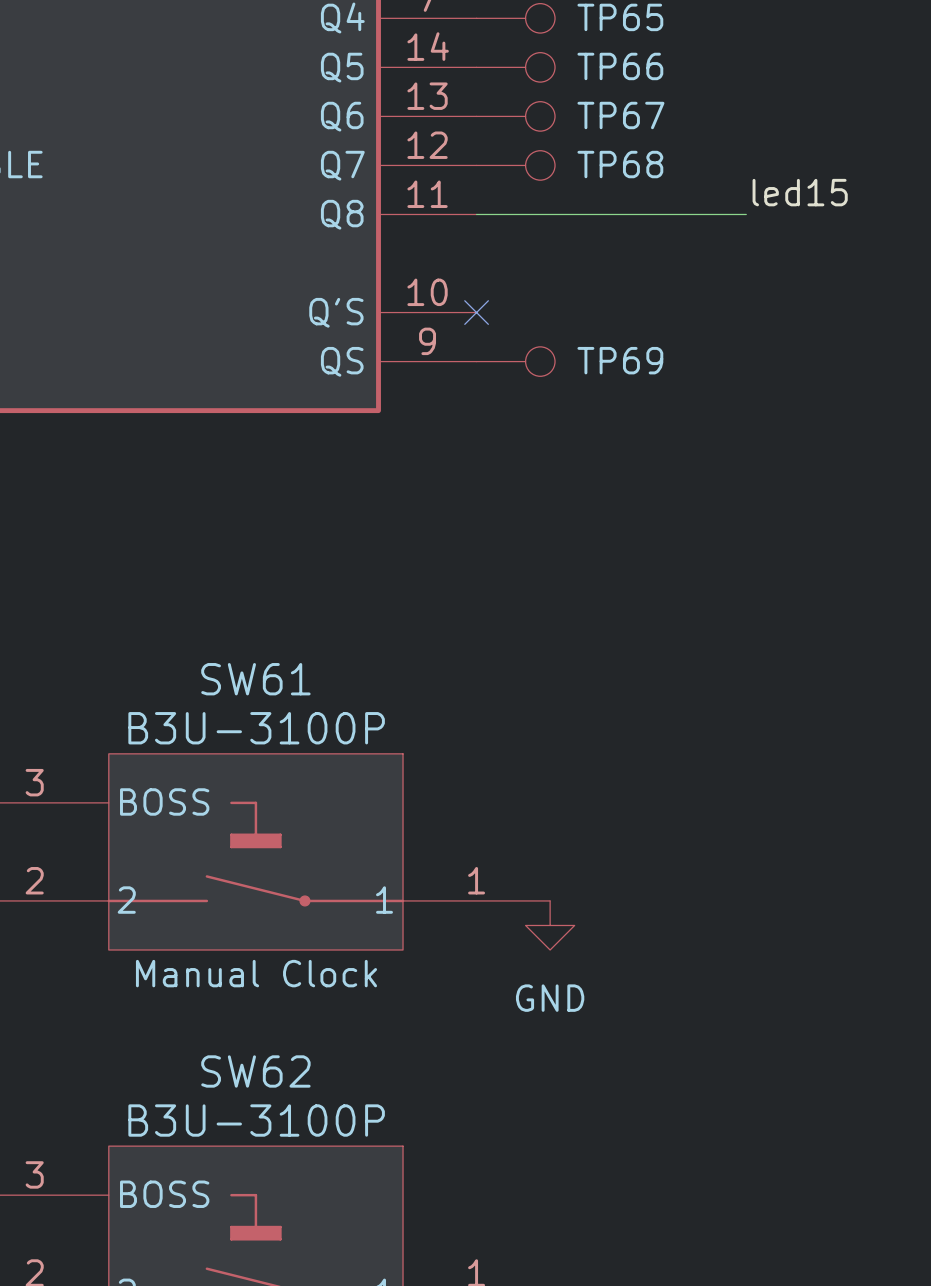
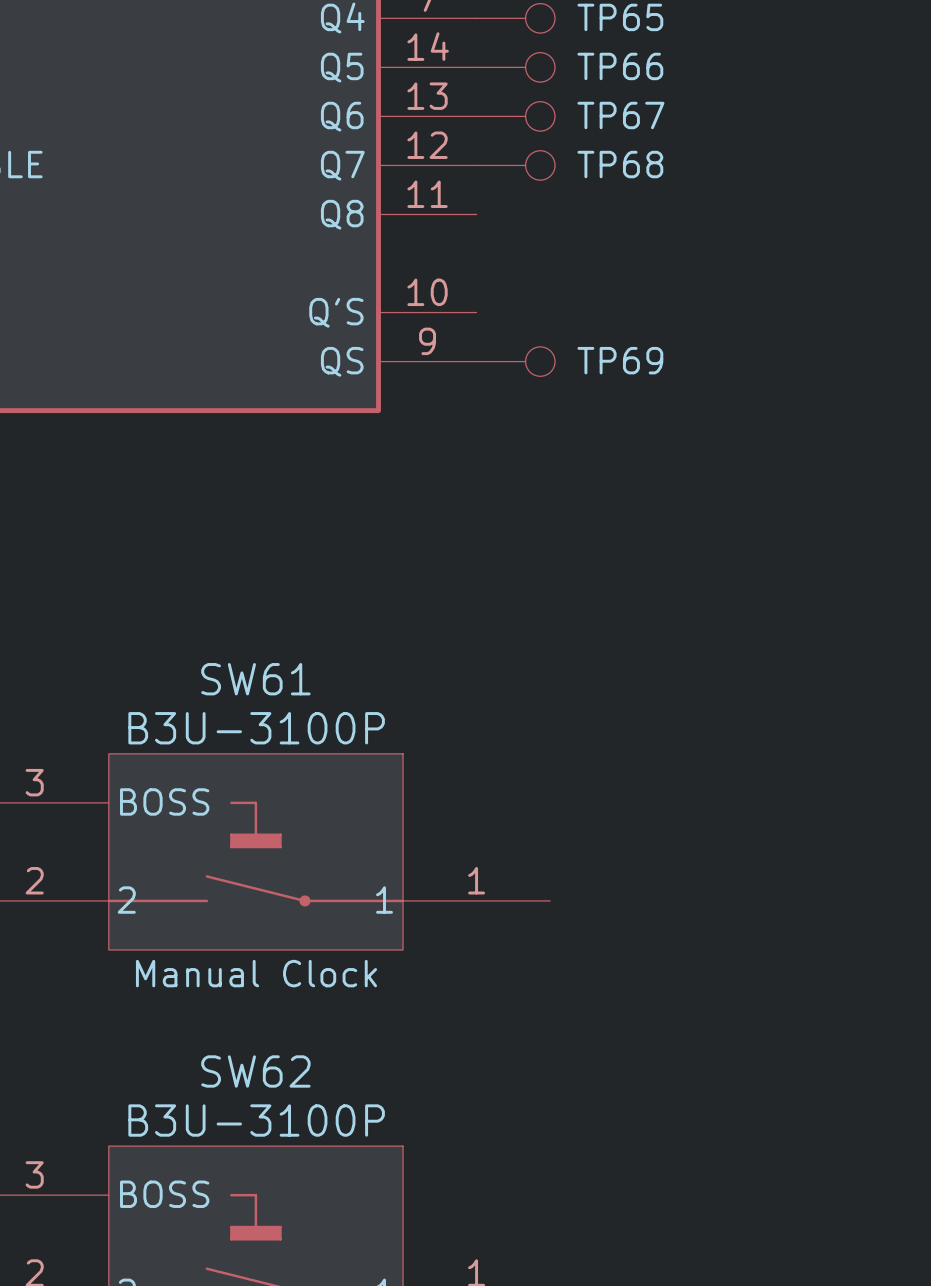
label: led15 (800, 192) -> none
wire: (476, 214) (746, 214) -> none
no-connect mark: (476, 312) -> none
power symbol: GND (550, 925) -> none

